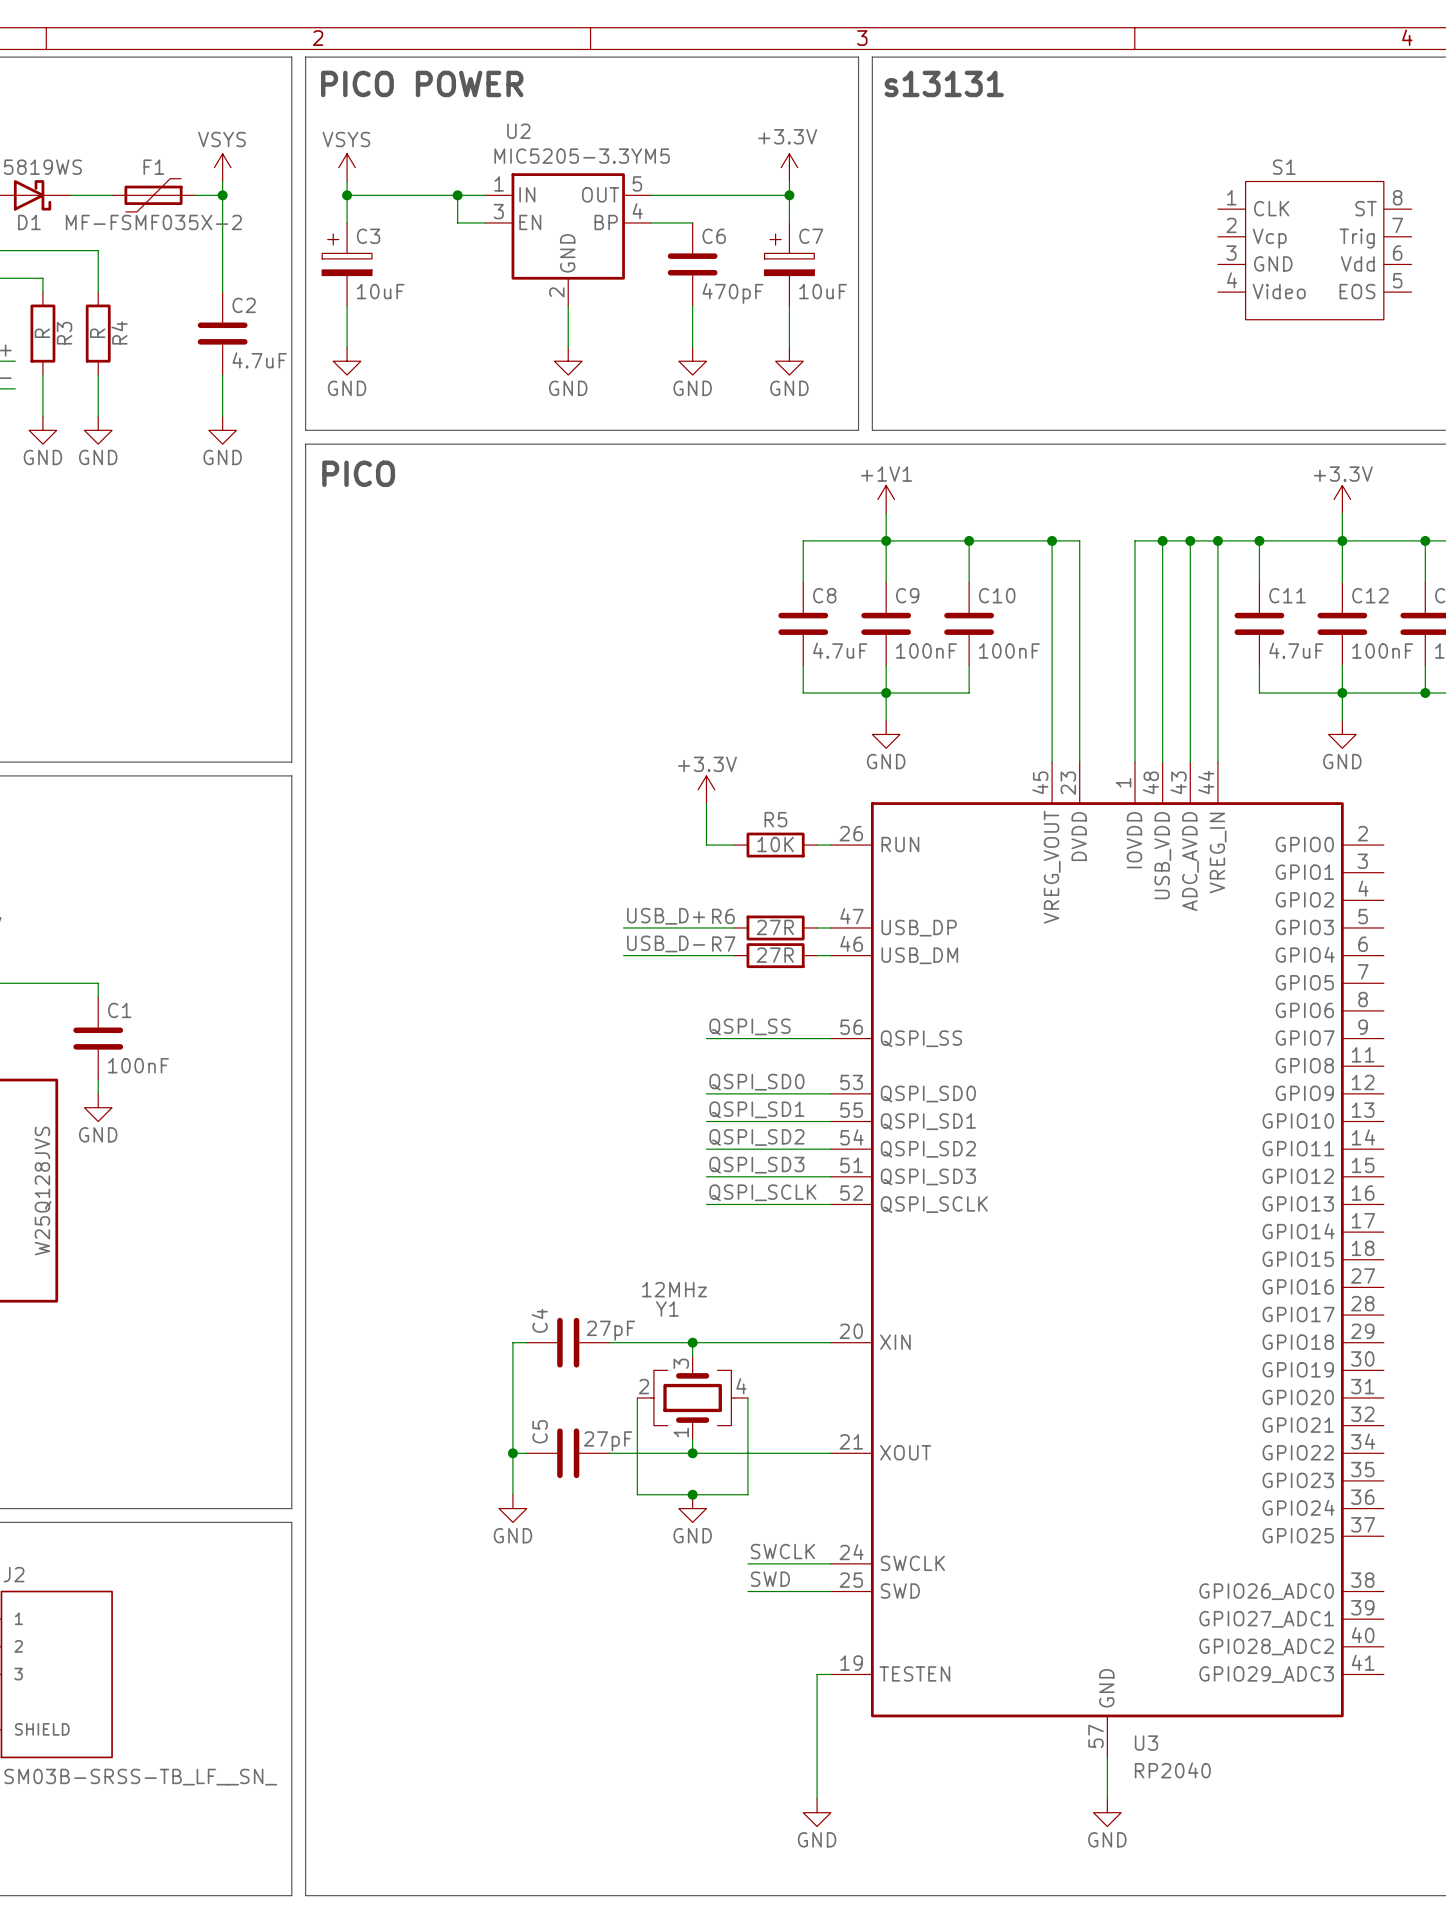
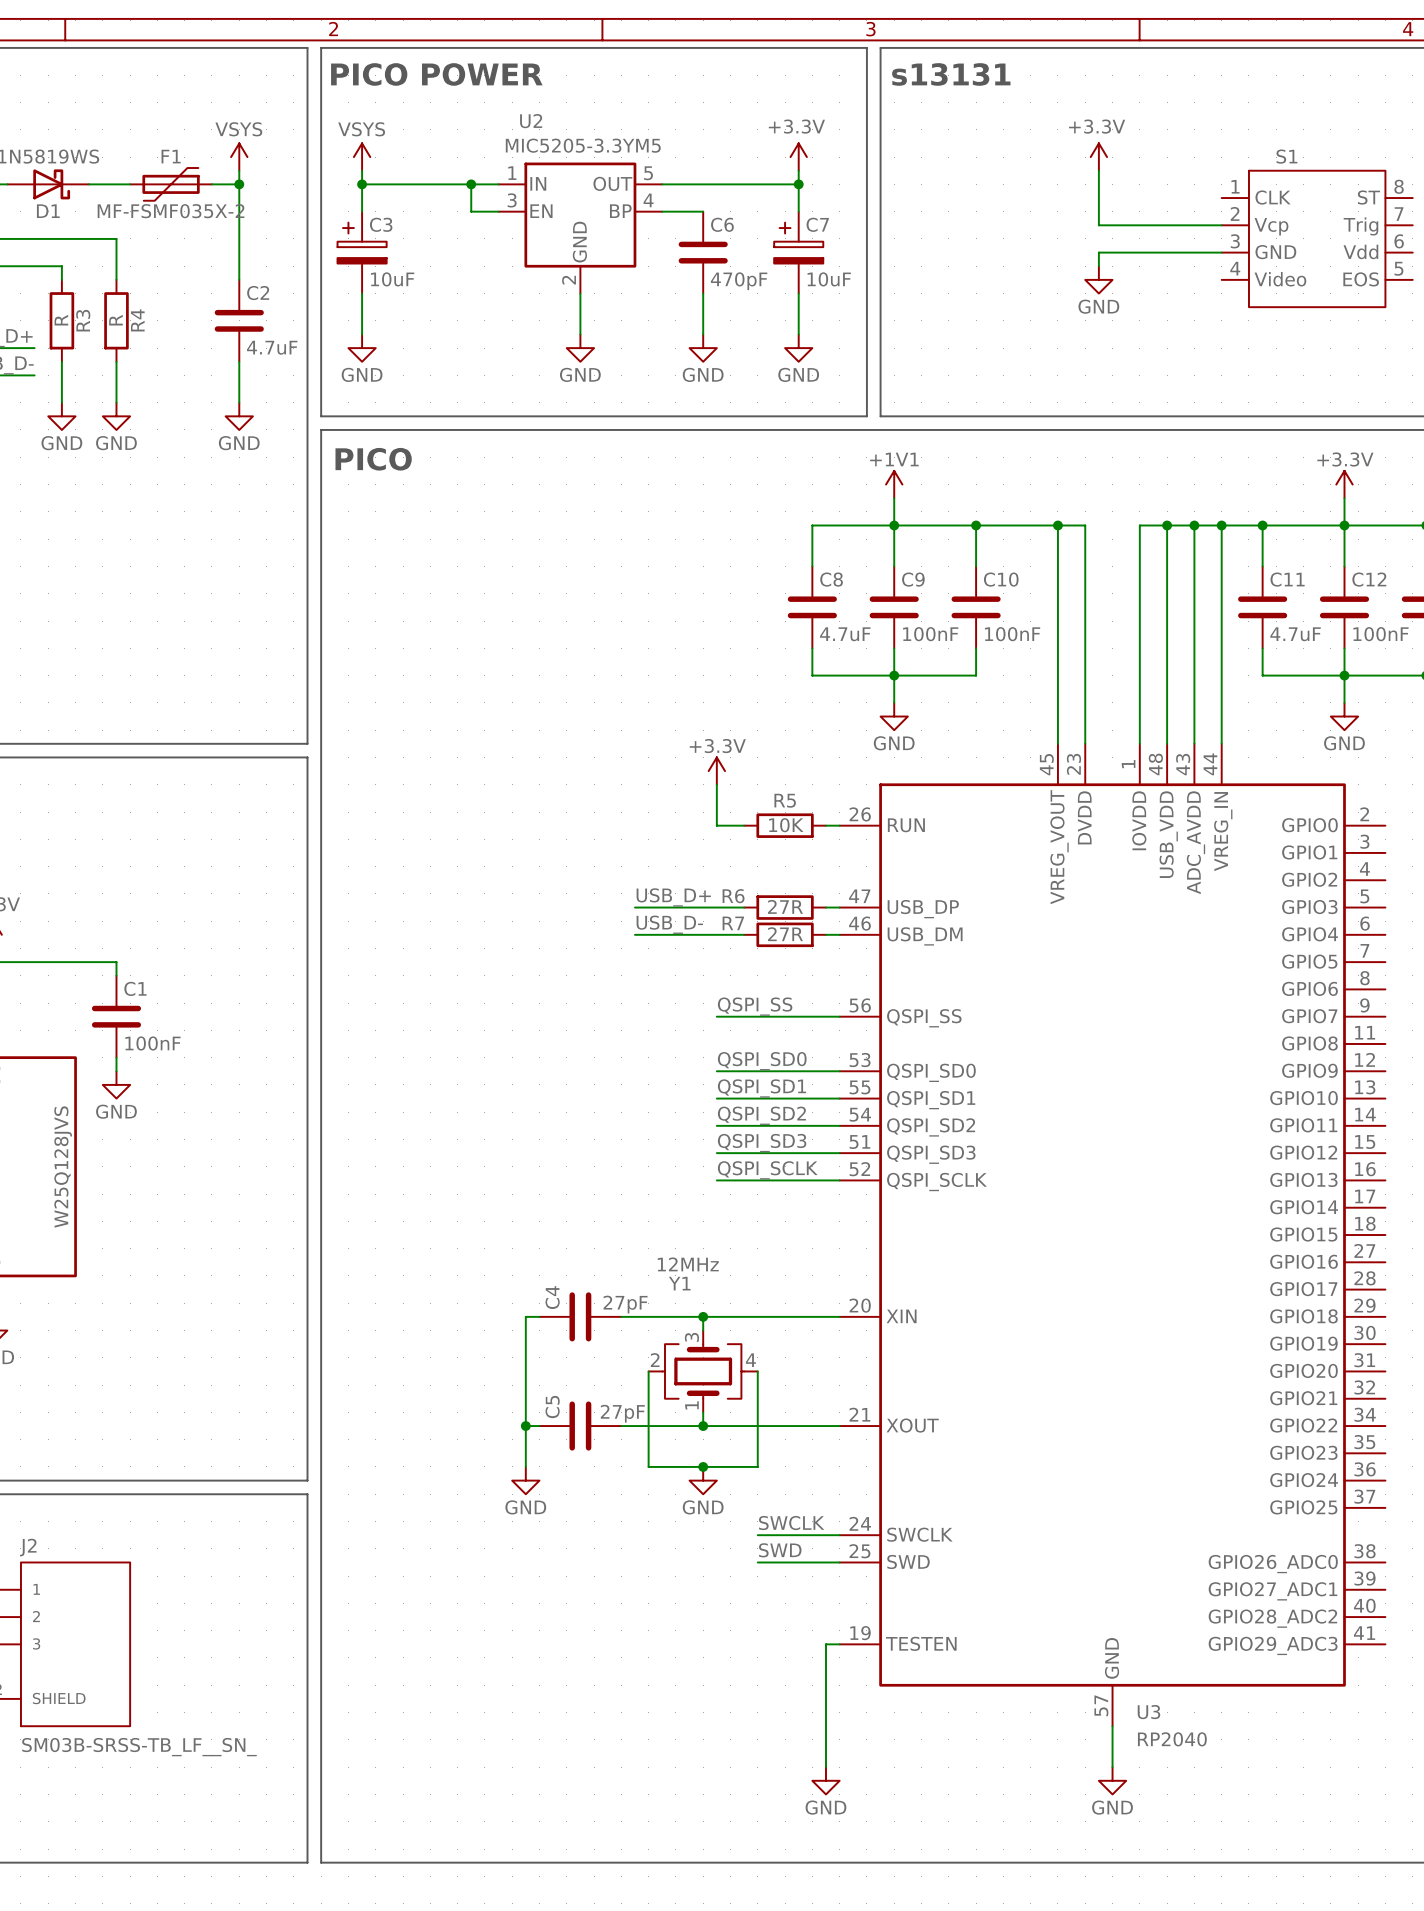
power symbol: none -> +3.3V (1098, 157)
wire: none -> (1098, 170) (1098, 225) (1221, 225)
wire: none -> (1221, 252) (1098, 252) (1098, 266)
power symbol: none -> GND (1098, 279)

